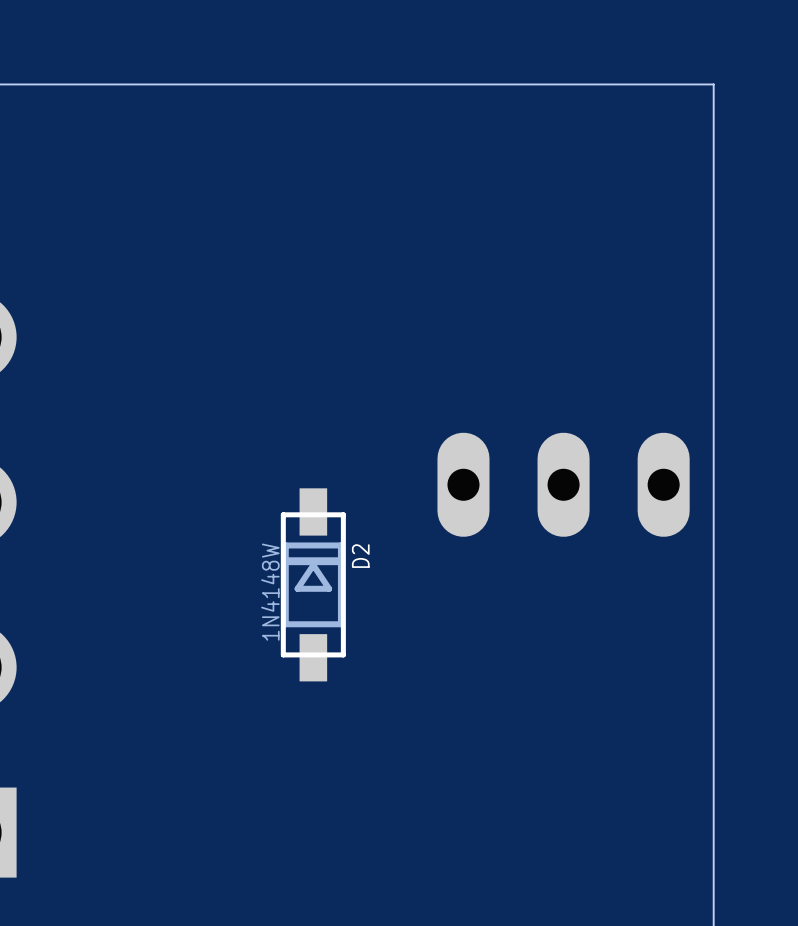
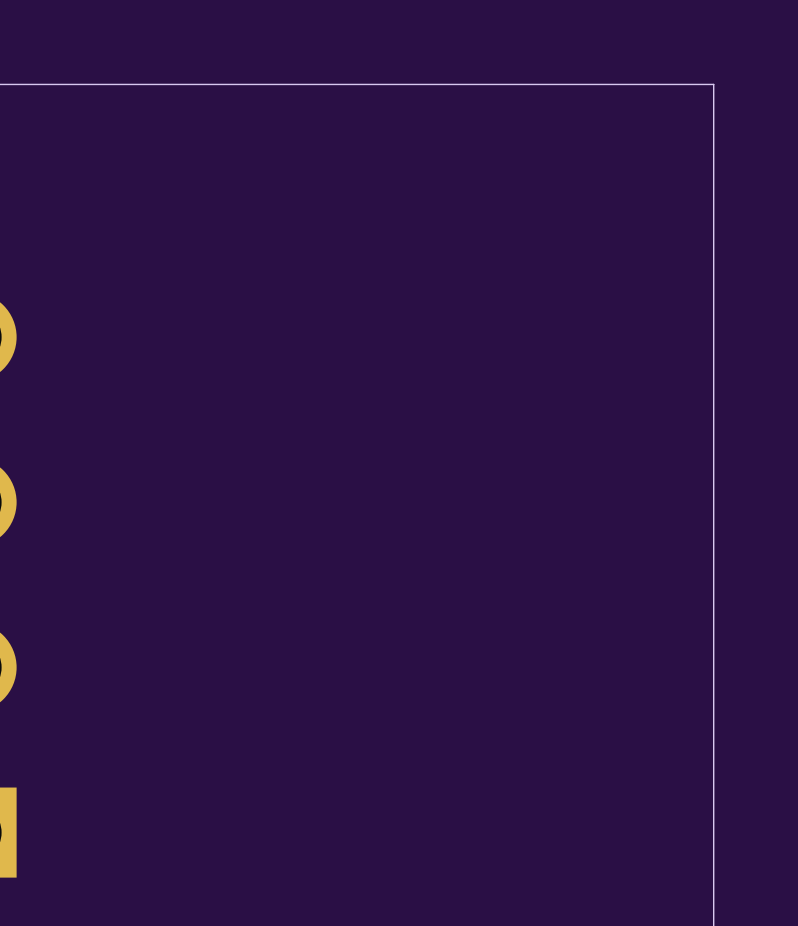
part: (563, 484) -> none
D2: 1N4148W (313, 584) -> none

